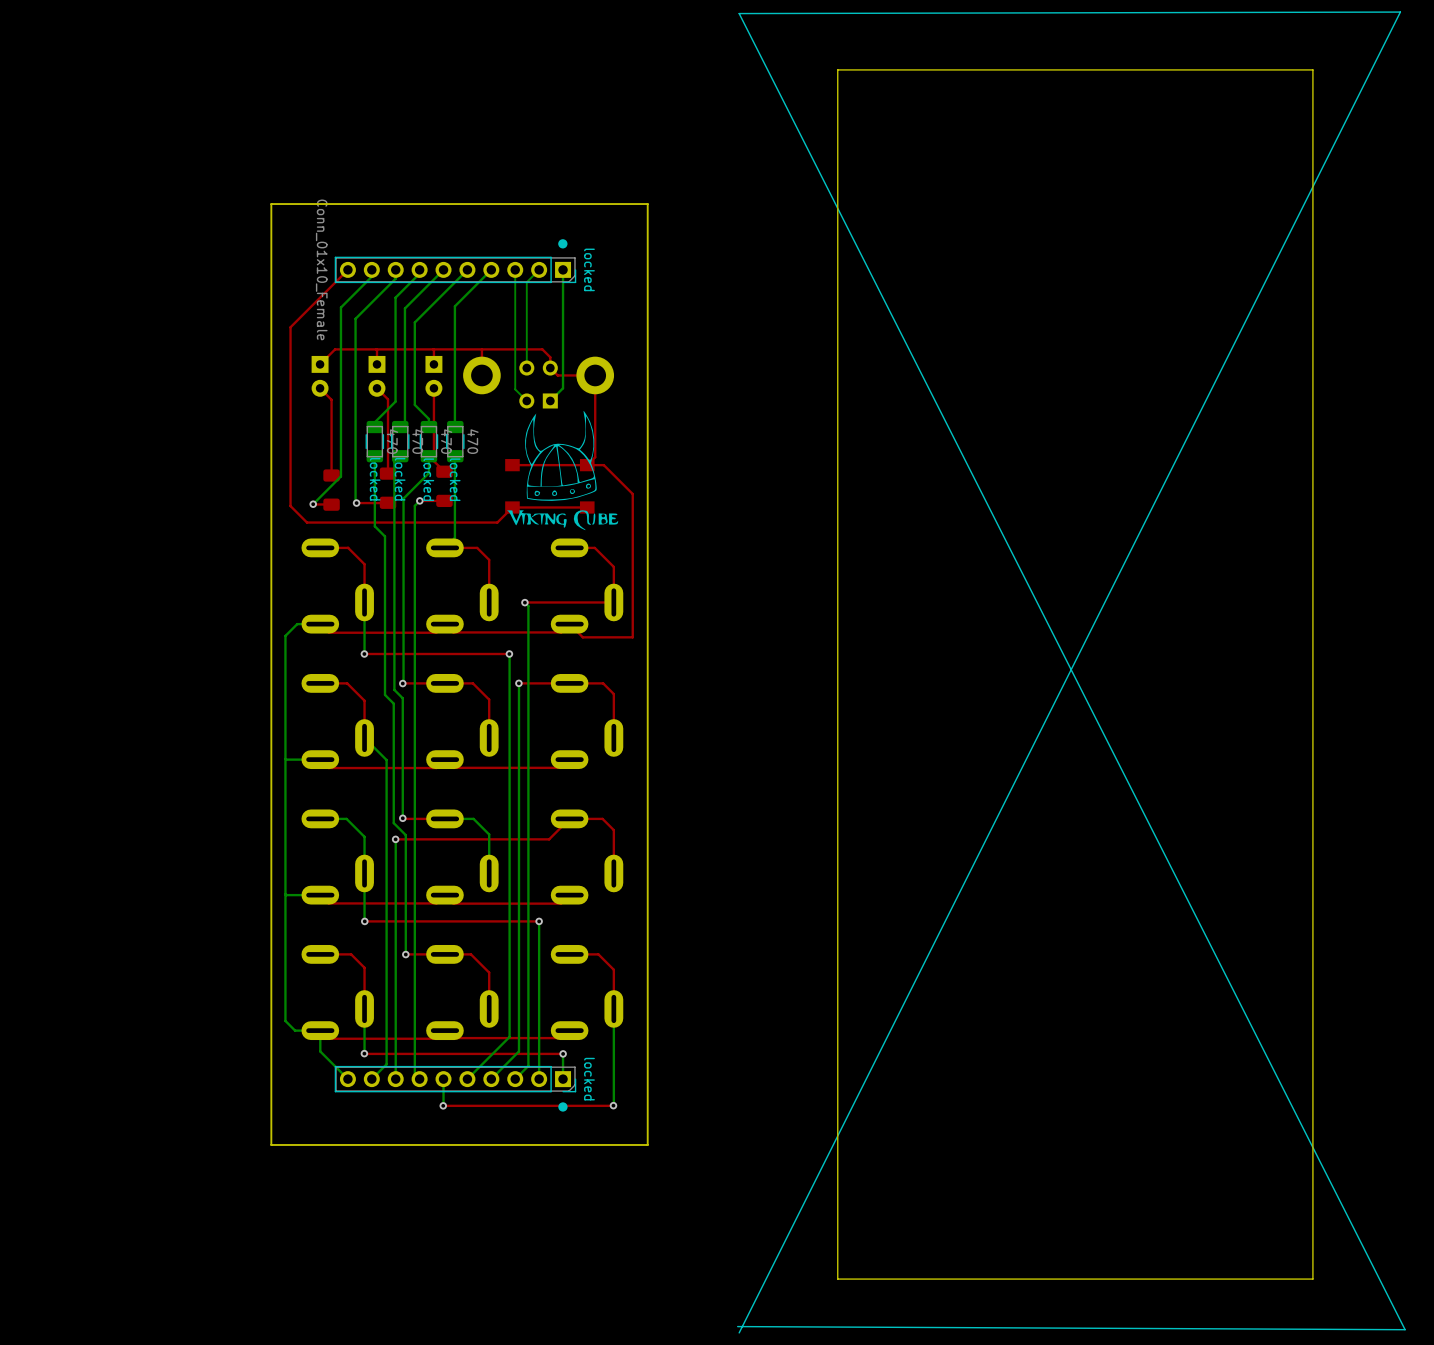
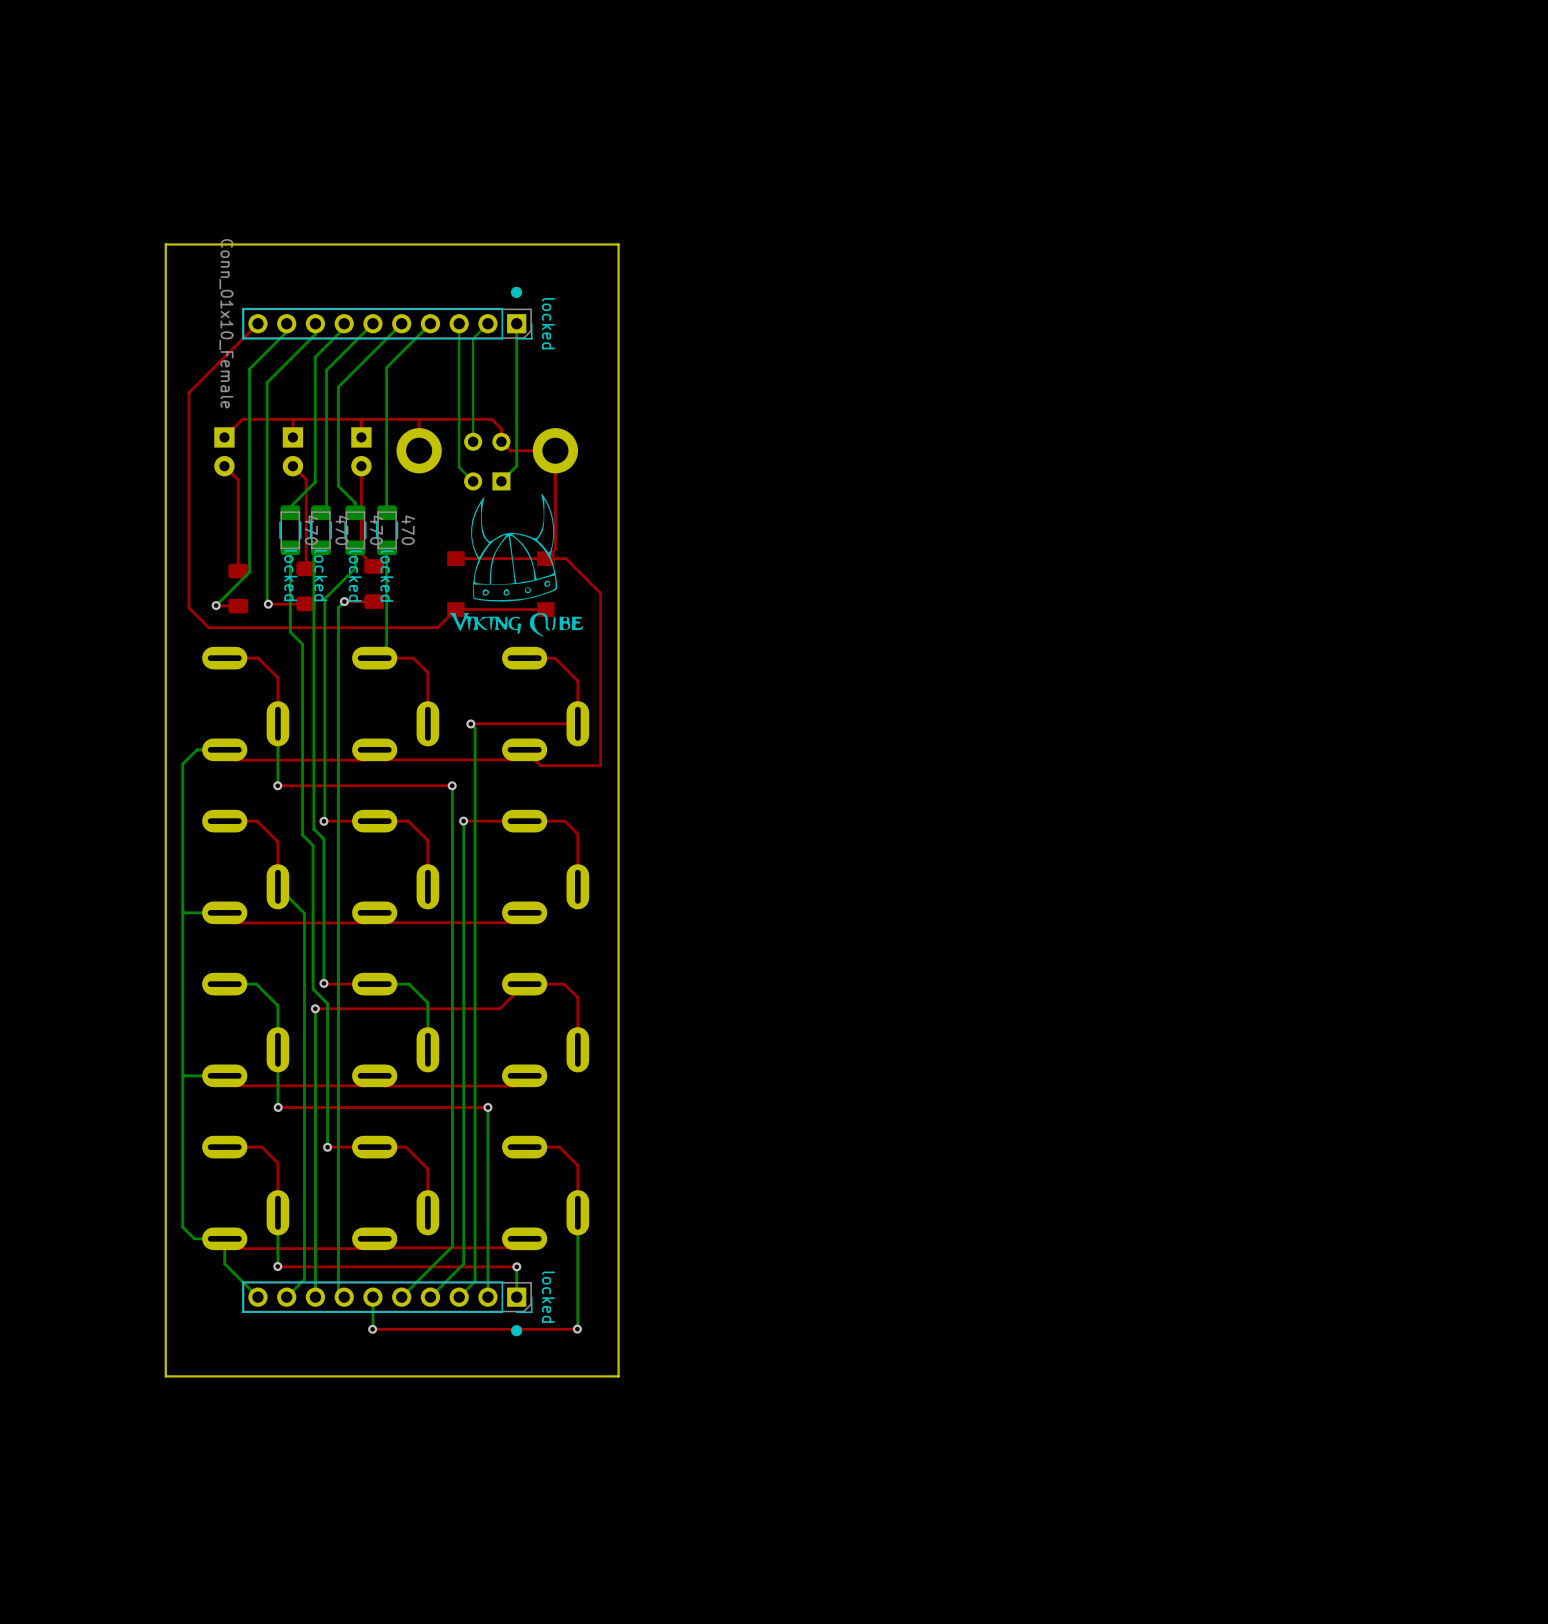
board edge: (1312, 69) (837, 69) (837, 1279) (1312, 1279) (1312, 69) -> none
line: (737, 1326) (1405, 1329) (739, 13) (1400, 12) (739, 1332) -> none

